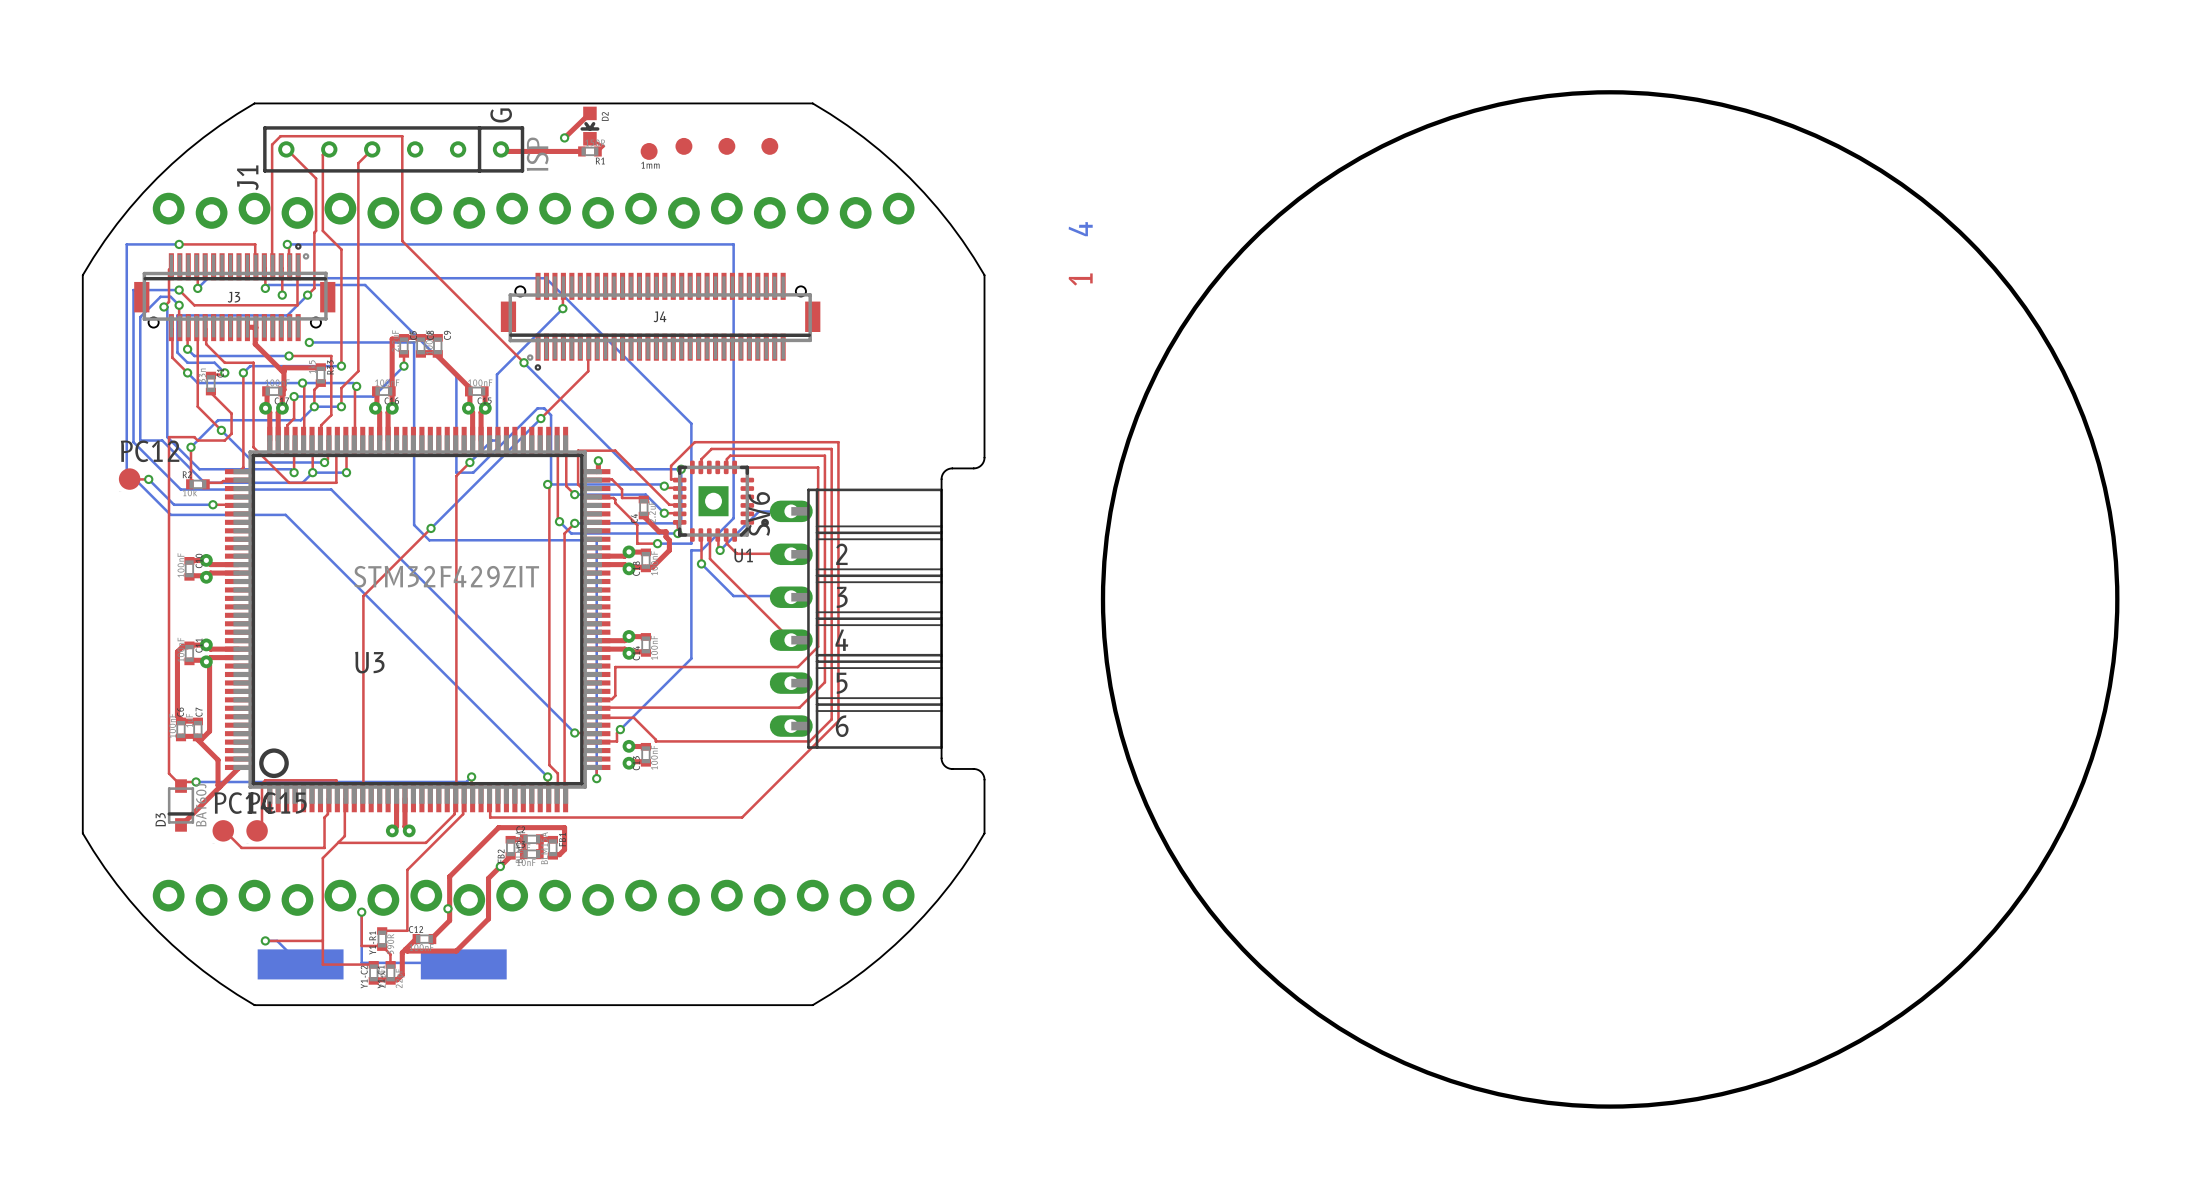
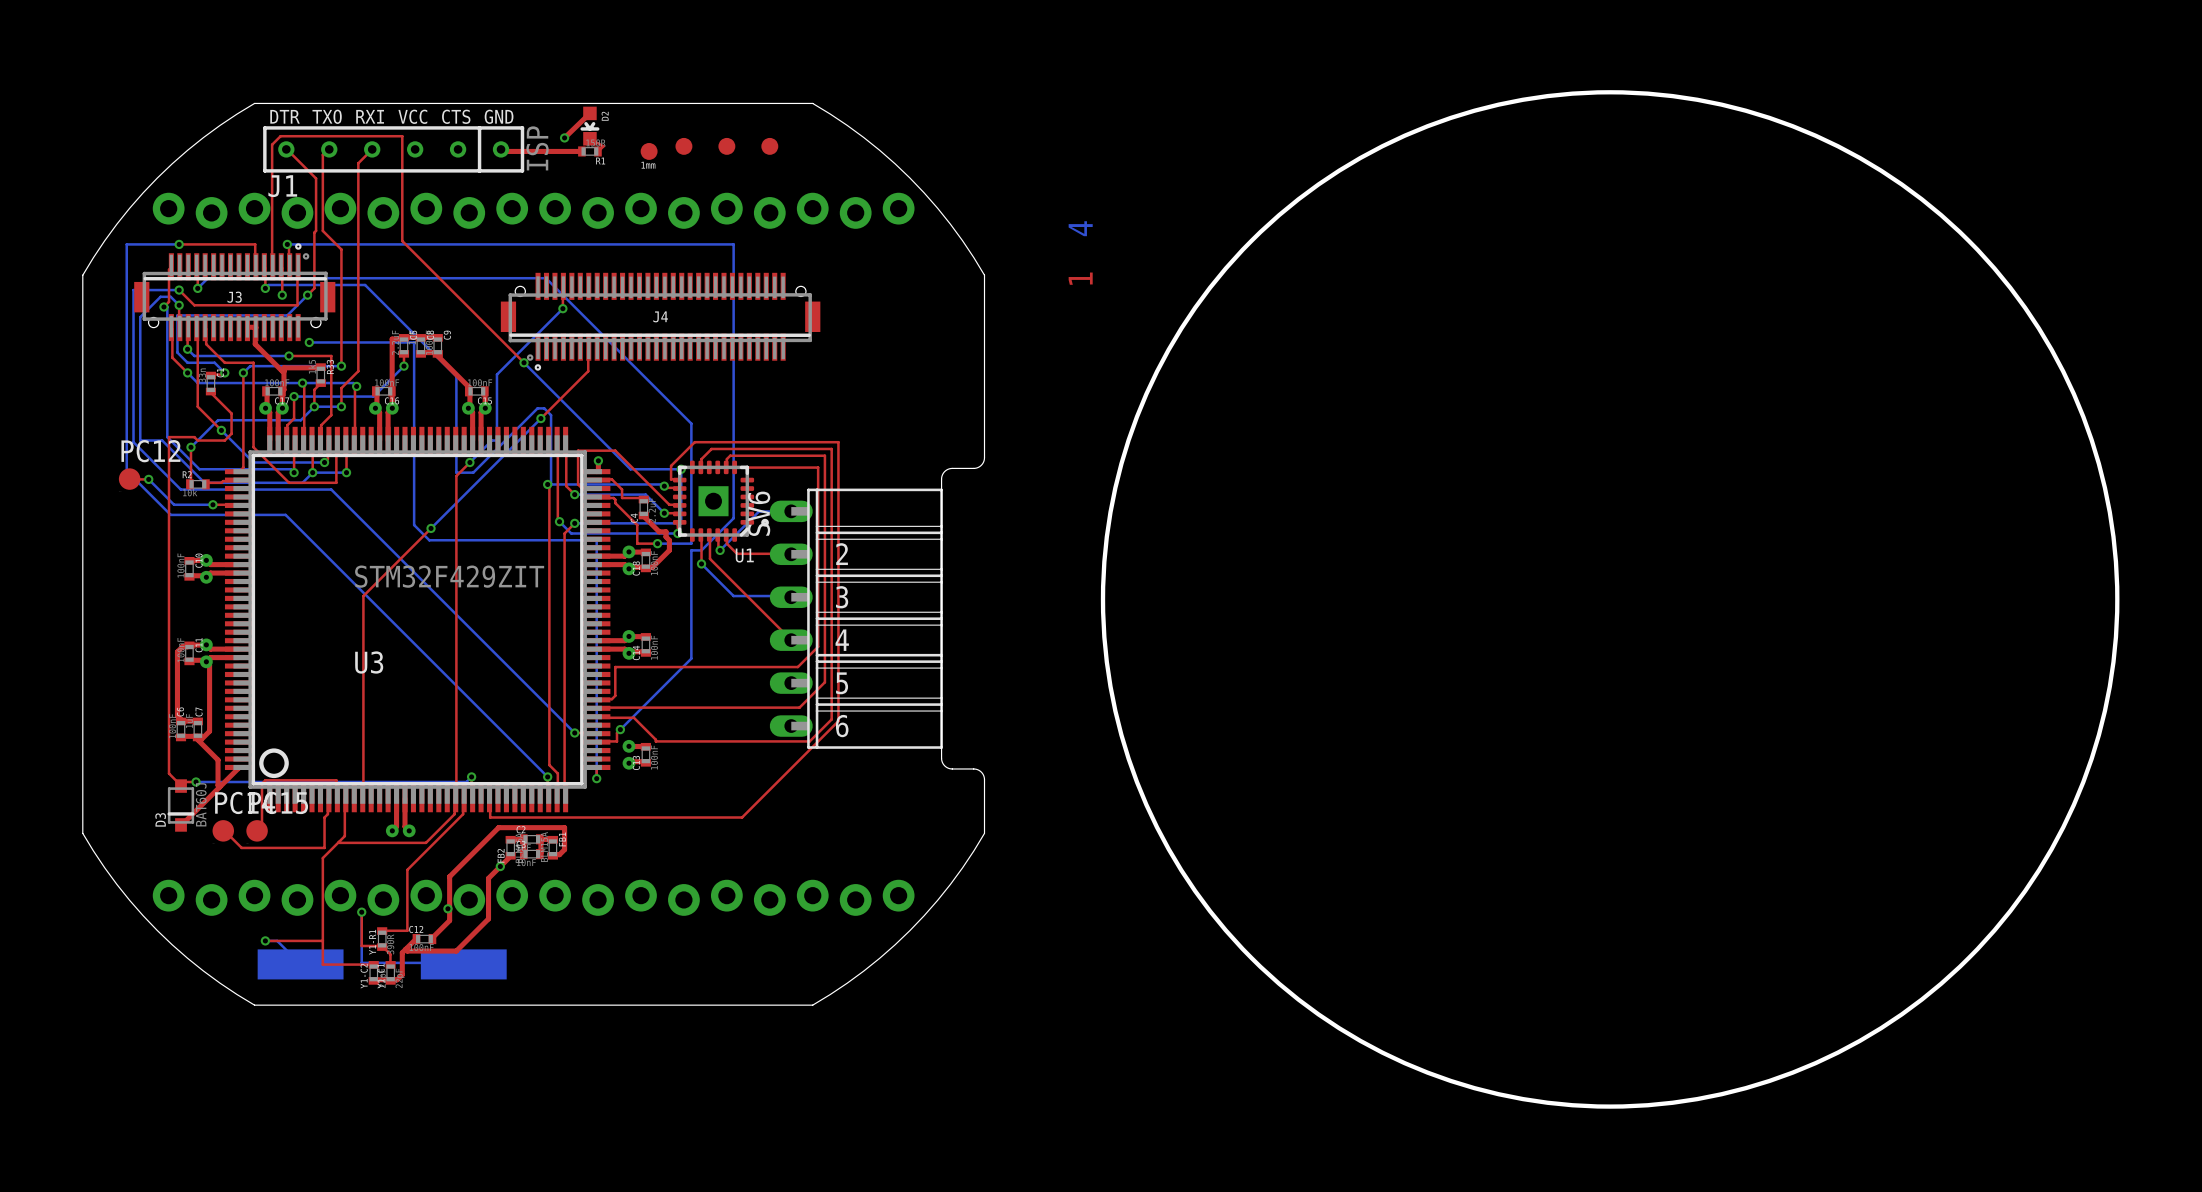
J1 text: G (501, 115) -> none
J1 text: none -> DTR (285, 116)
J1 text: none -> TXO (327, 116)
J1 text: none -> RXI (370, 116)
J1 text: none -> VCC (412, 116)
J1 text: none -> CTS (456, 116)
J1 text: none -> GND (499, 116)
J1 name rotation: 0° (247, 177) -> 90° clockwise (282, 186)

